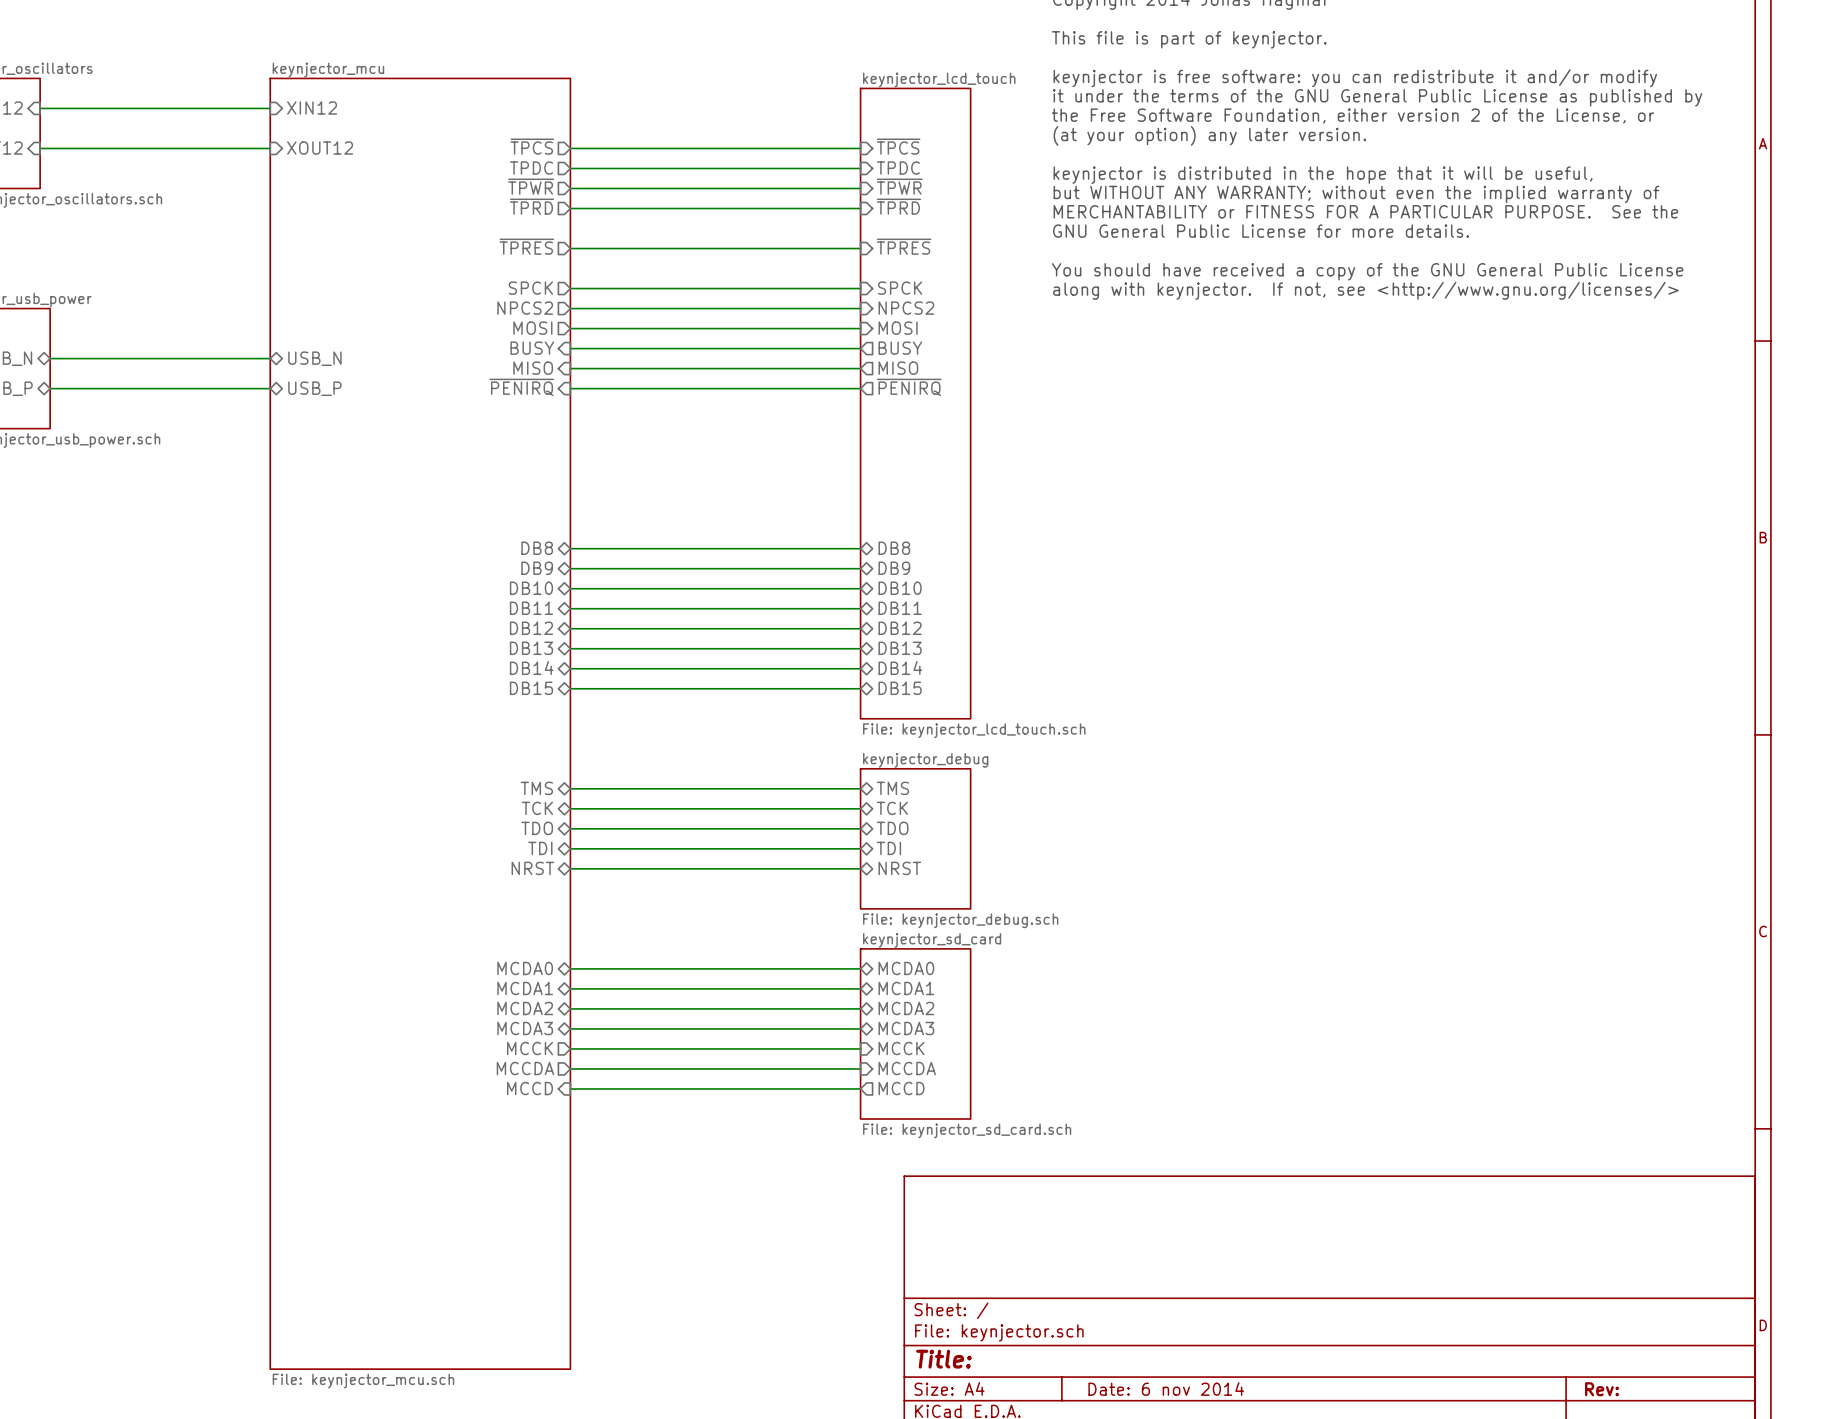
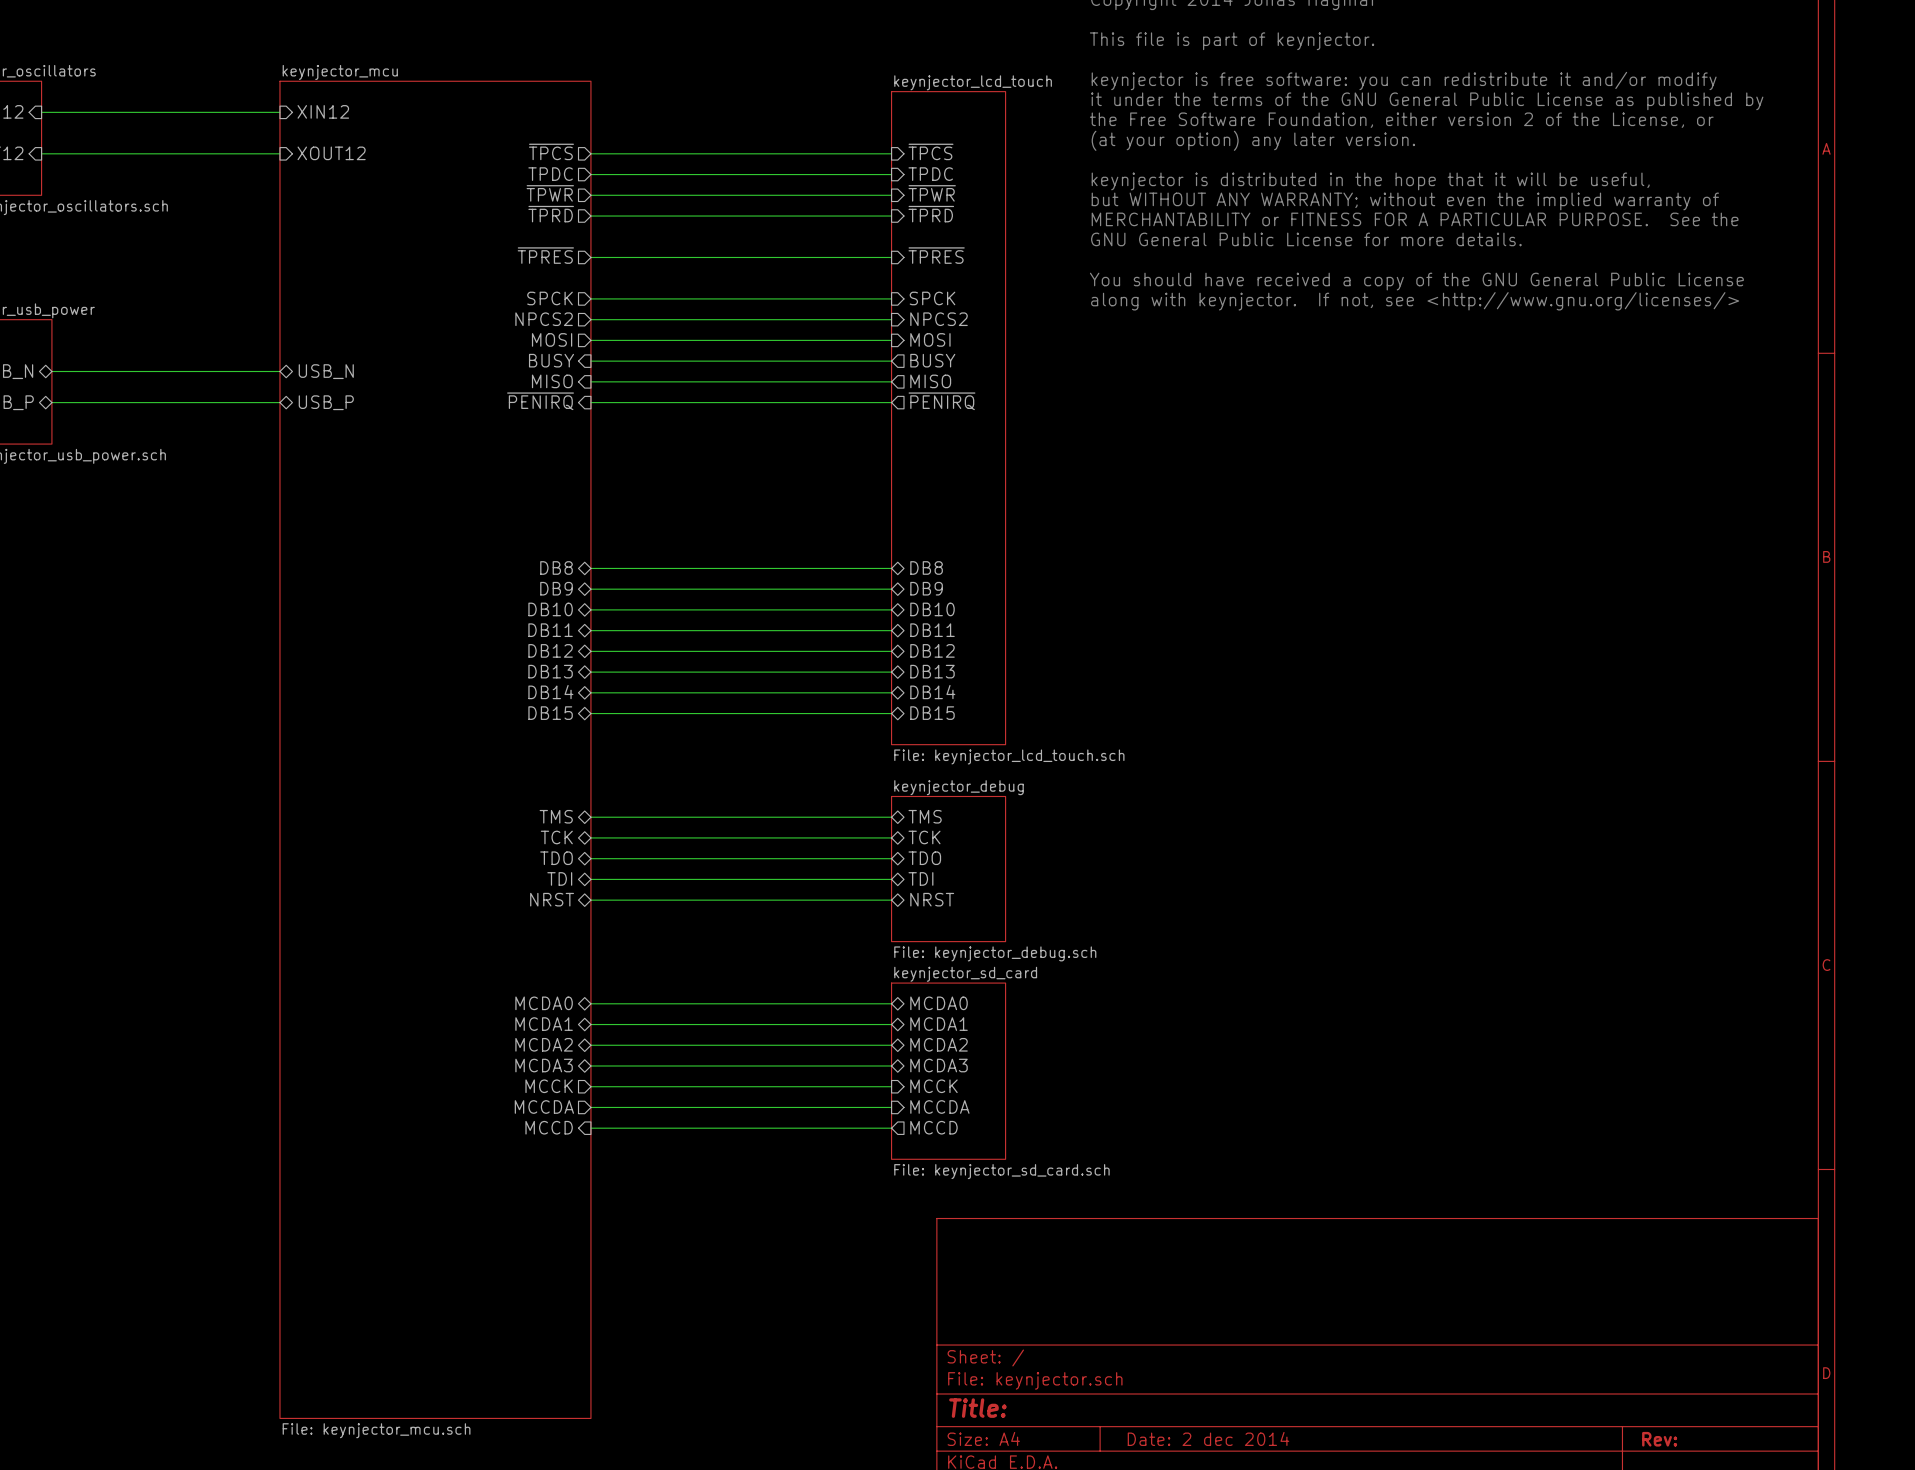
title block: Date: 6 nov 2014 (1166, 1388) -> Date: 2 dec 2014 (1208, 1438)

